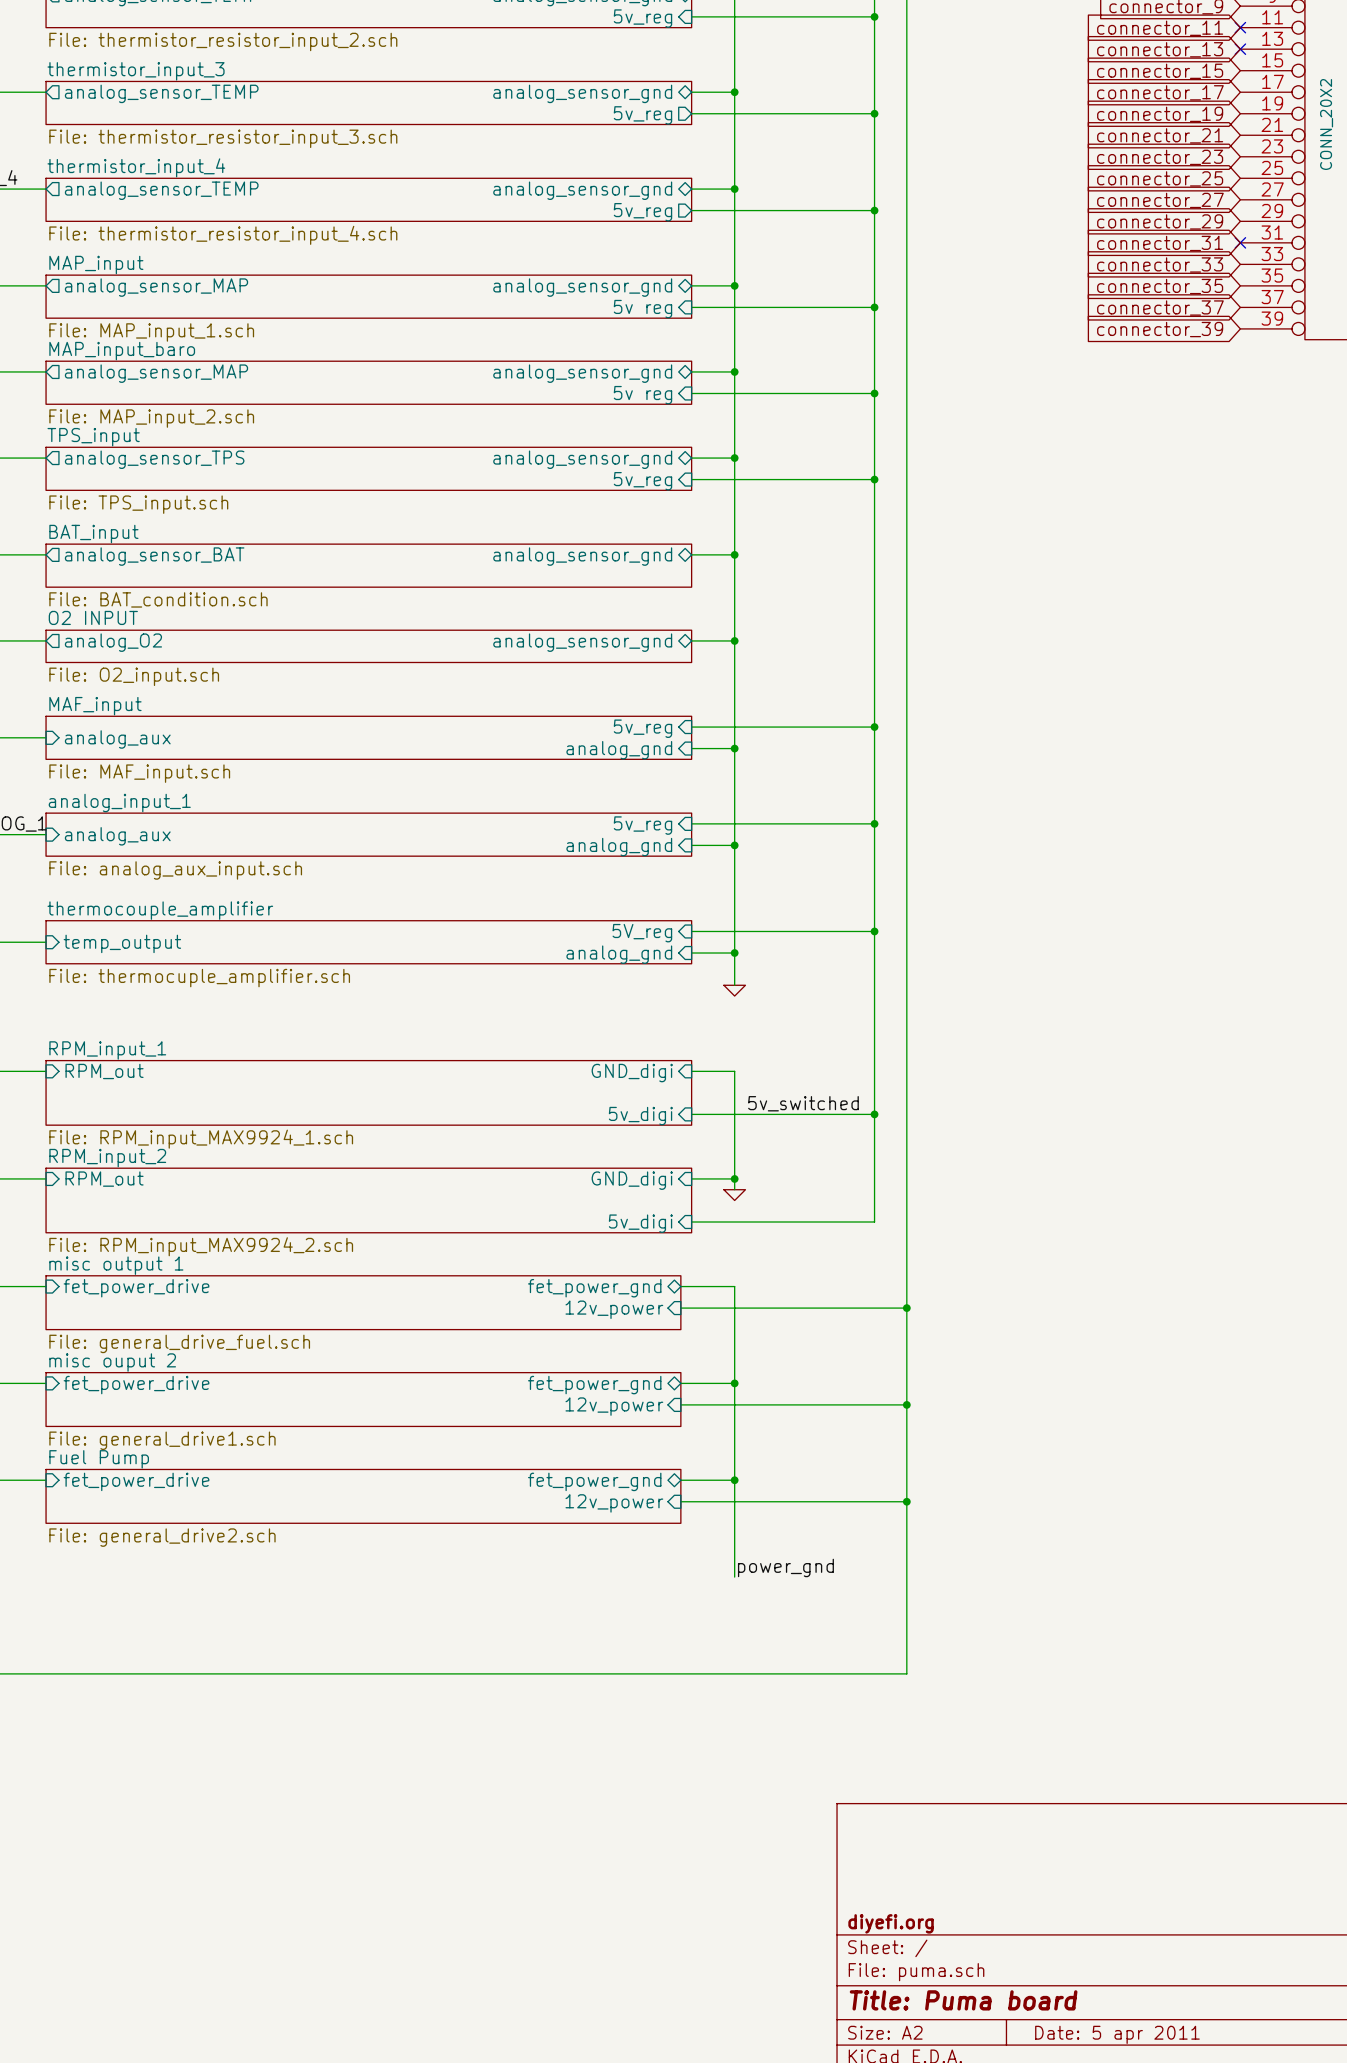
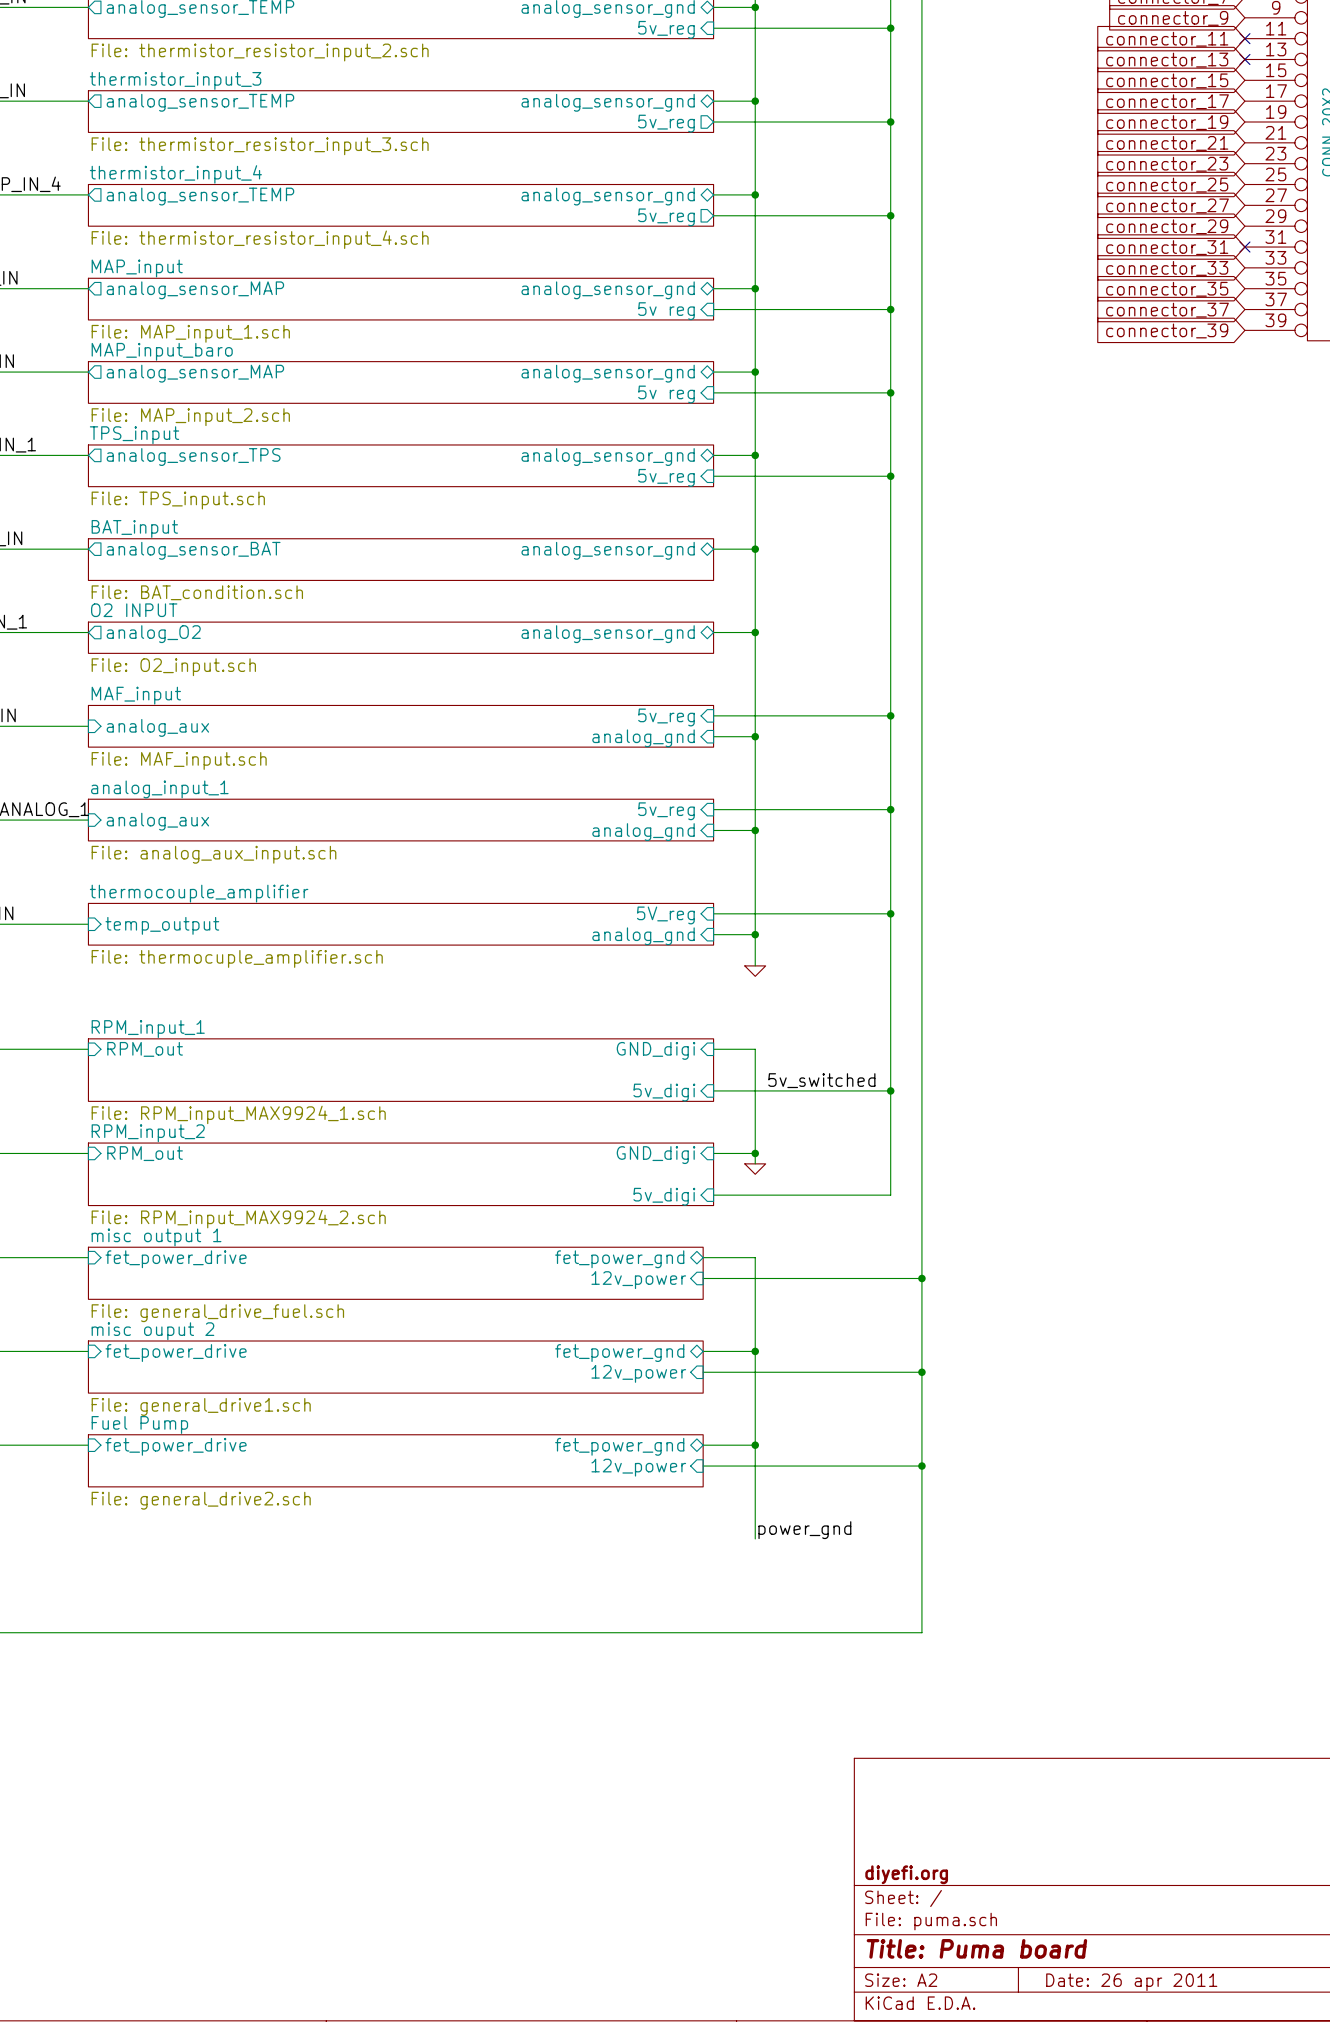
title block: Date: 5 apr 2011 (1117, 2034) -> Date: 26 apr 2011 (1131, 1982)

